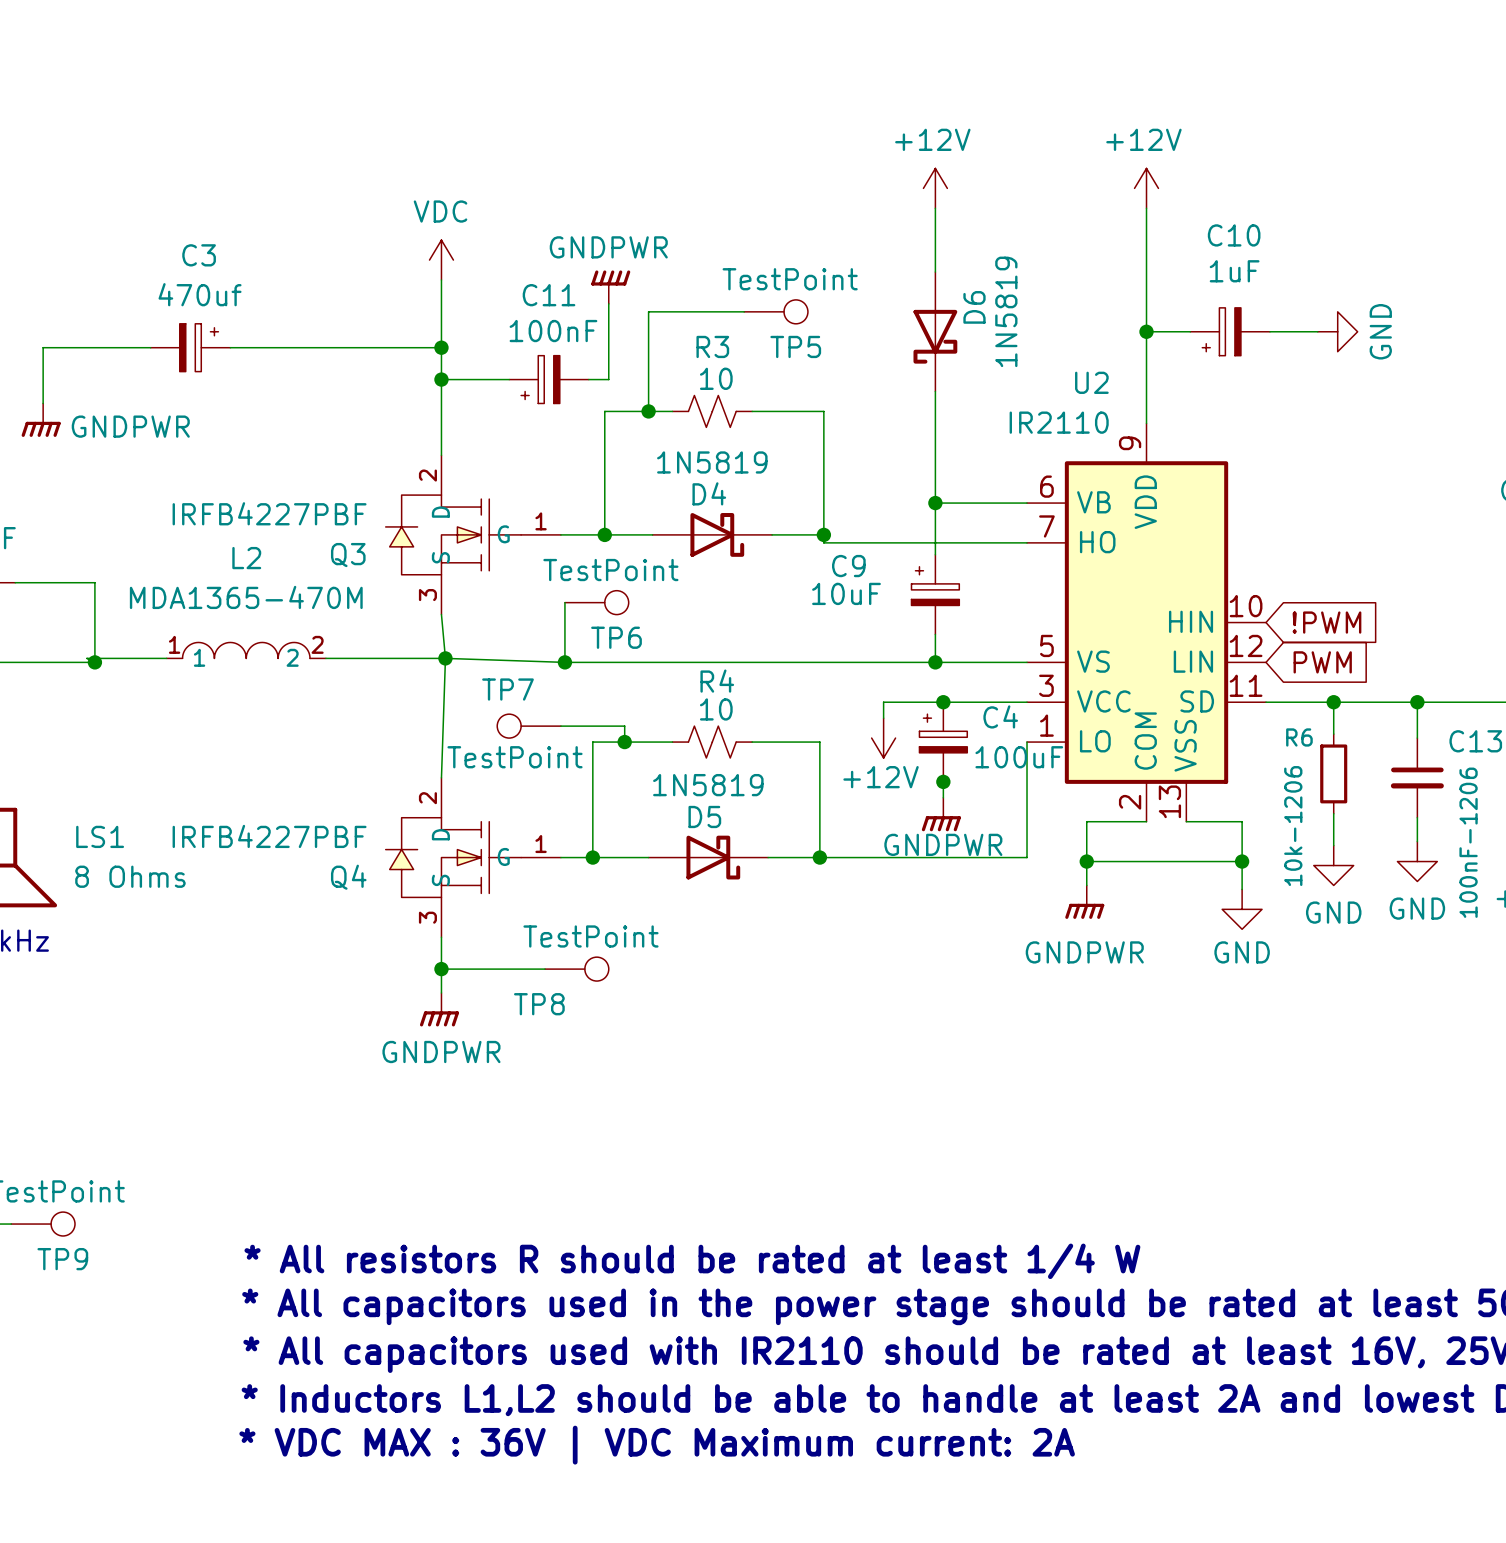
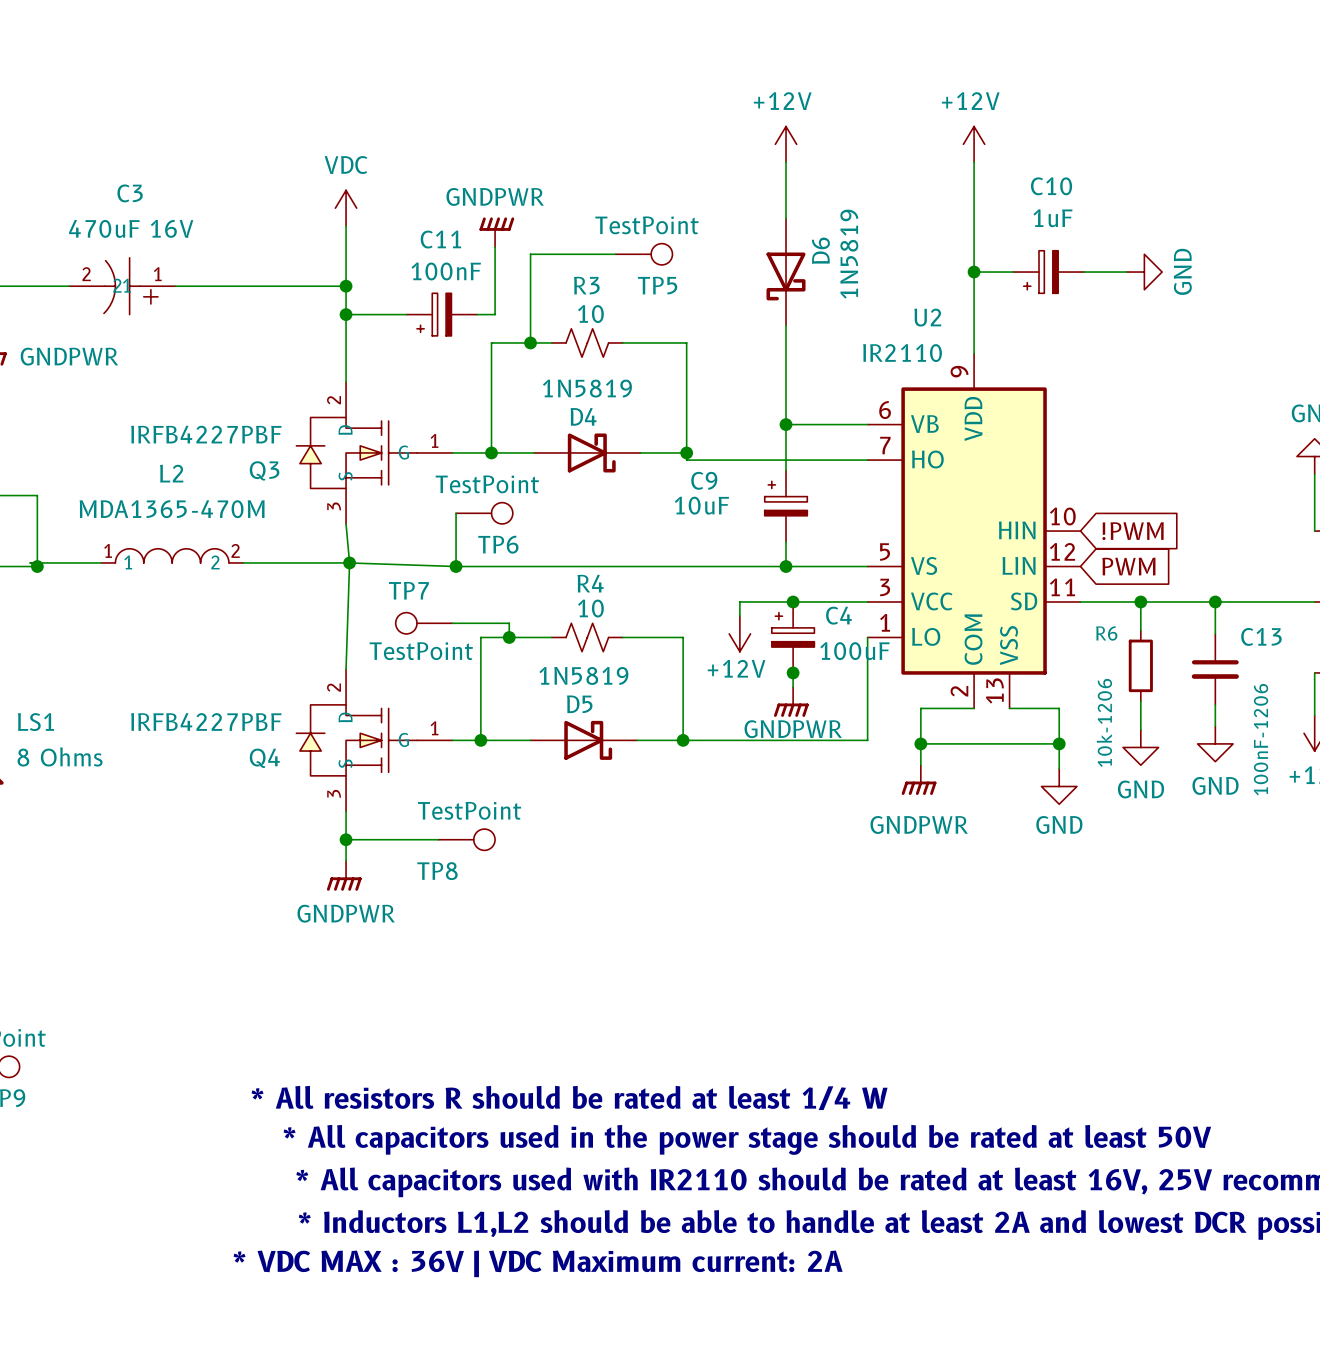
C3 value: 470uf (200, 294) -> 470uF 16V (131, 228)
C3 symbol: [150, 323, 231, 372] -> [69, 257, 176, 315]

